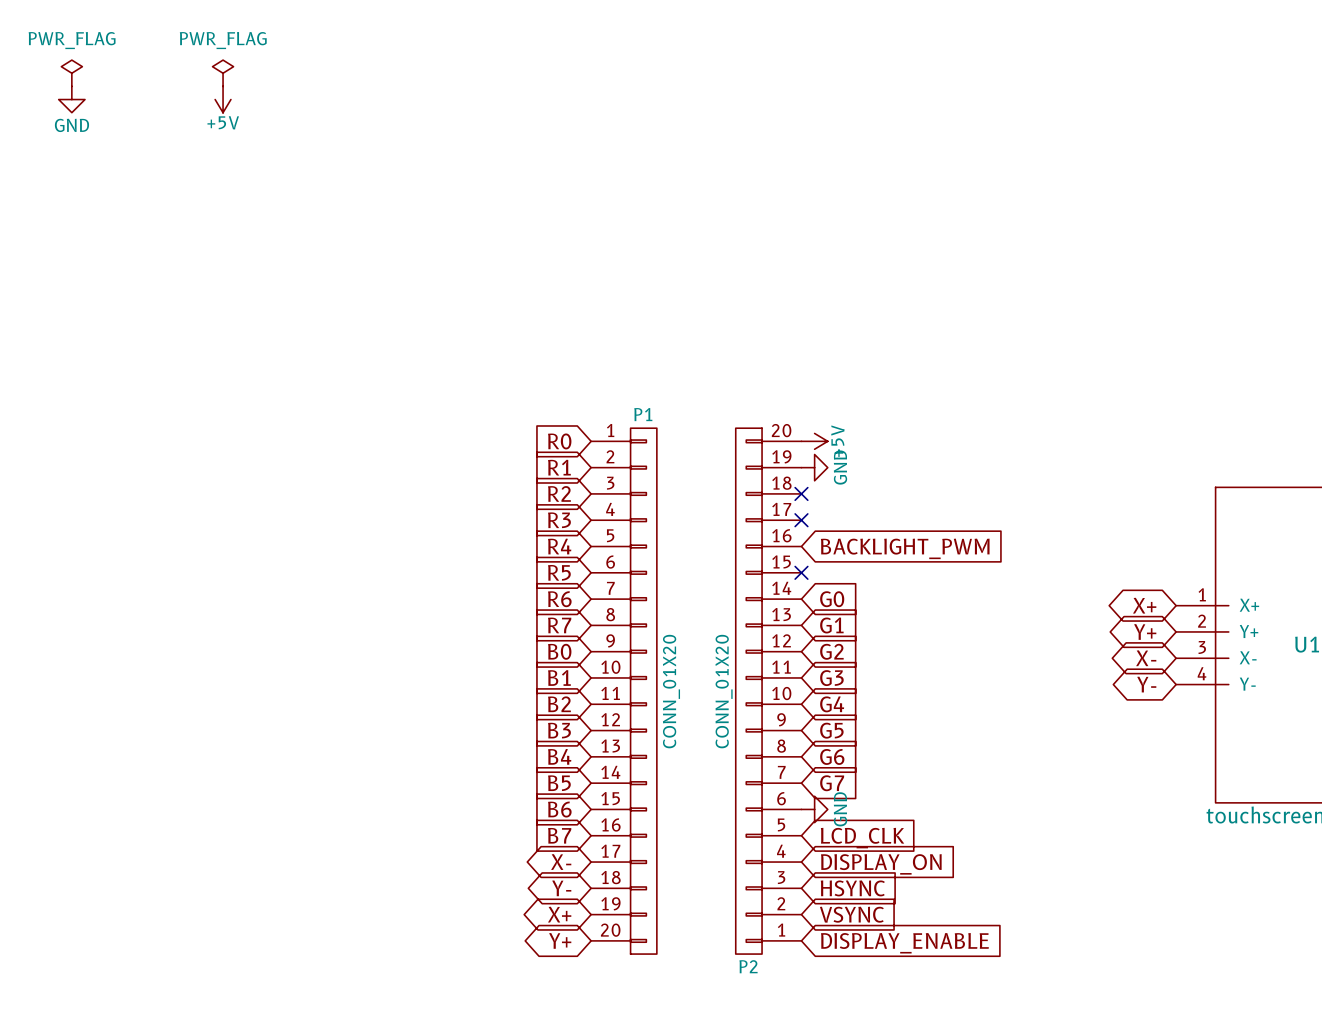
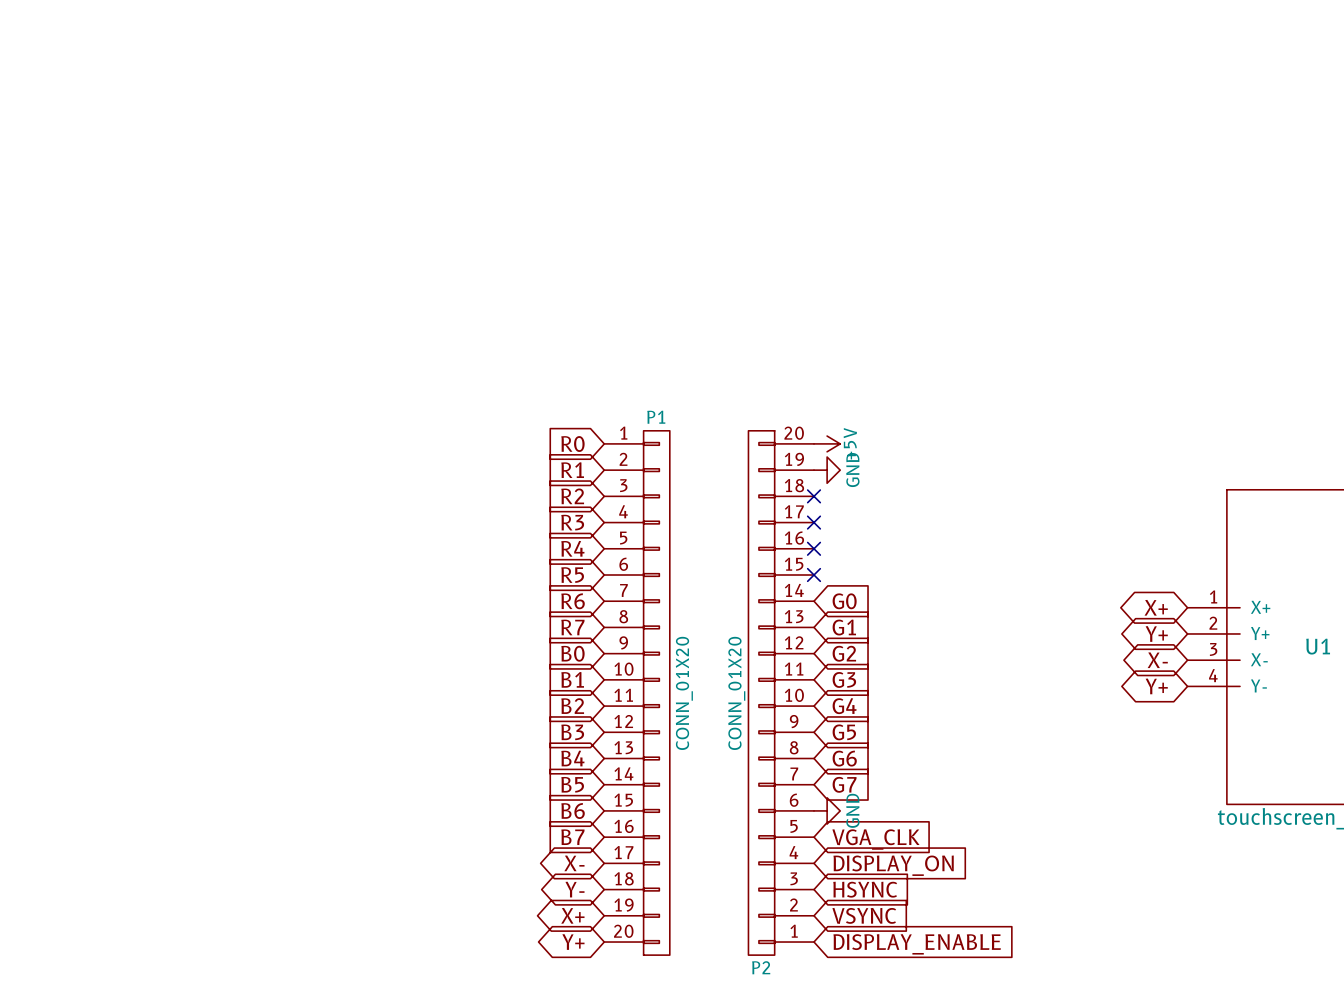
power symbol: PWR_FLAG (71, 73) -> none
power symbol: PWR_FLAG (223, 73) -> none
power symbol: GND (71, 99) -> none
power symbol: +5V (223, 99) -> none
no-connect mark: none -> (814, 548)
global label: BACKLIGHT_PWM (905, 548) -> none
global label: Y- (1146, 684) -> Y+ (1156, 686)
global label: LCD_CLK (862, 838) -> VGA_CLK (875, 839)

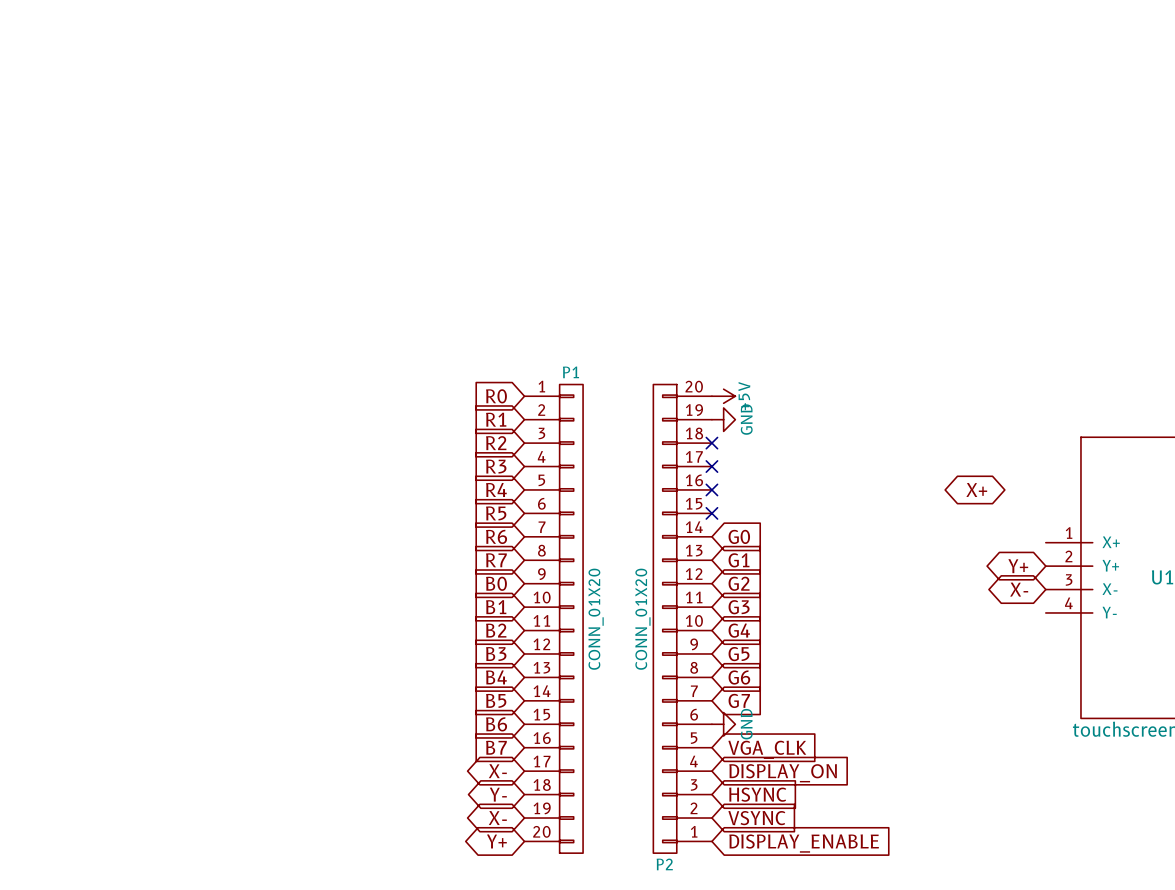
global label position: X+ (1156, 607) -> X+ (976, 489)
global label: Y+ (1156, 686) -> none
global label: X+ (572, 915) -> X- (497, 818)

